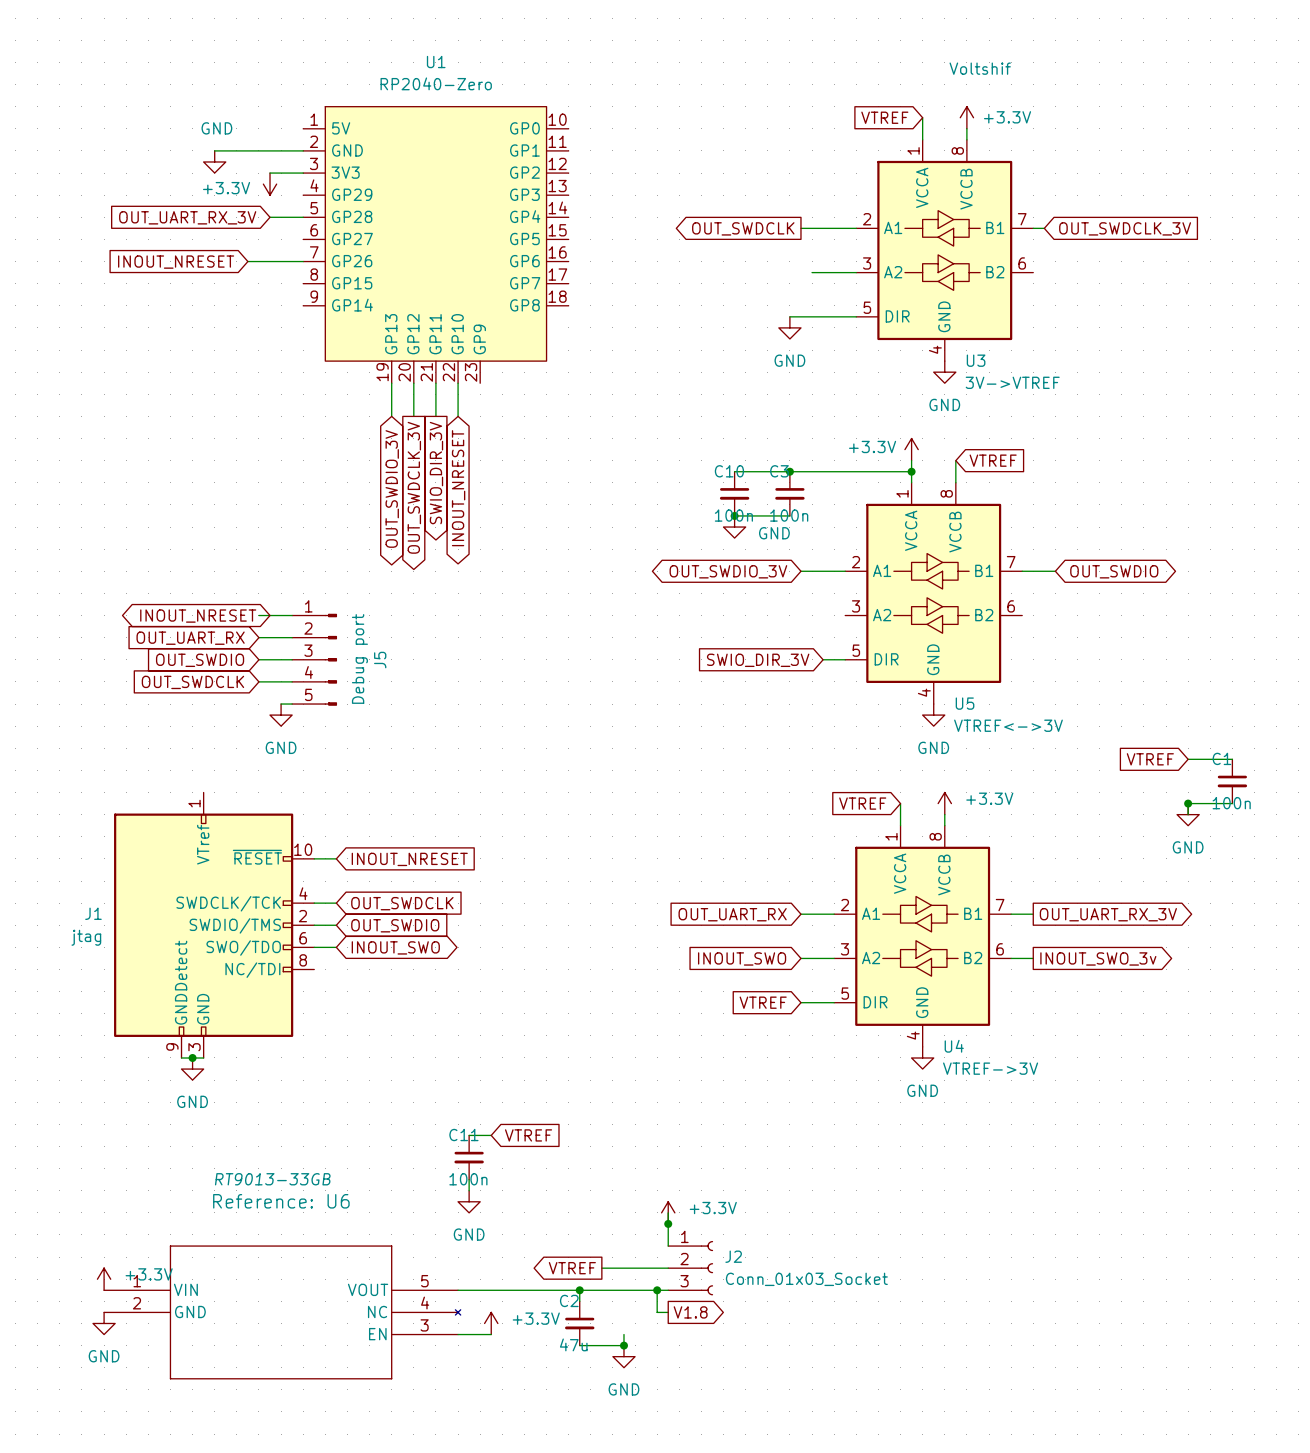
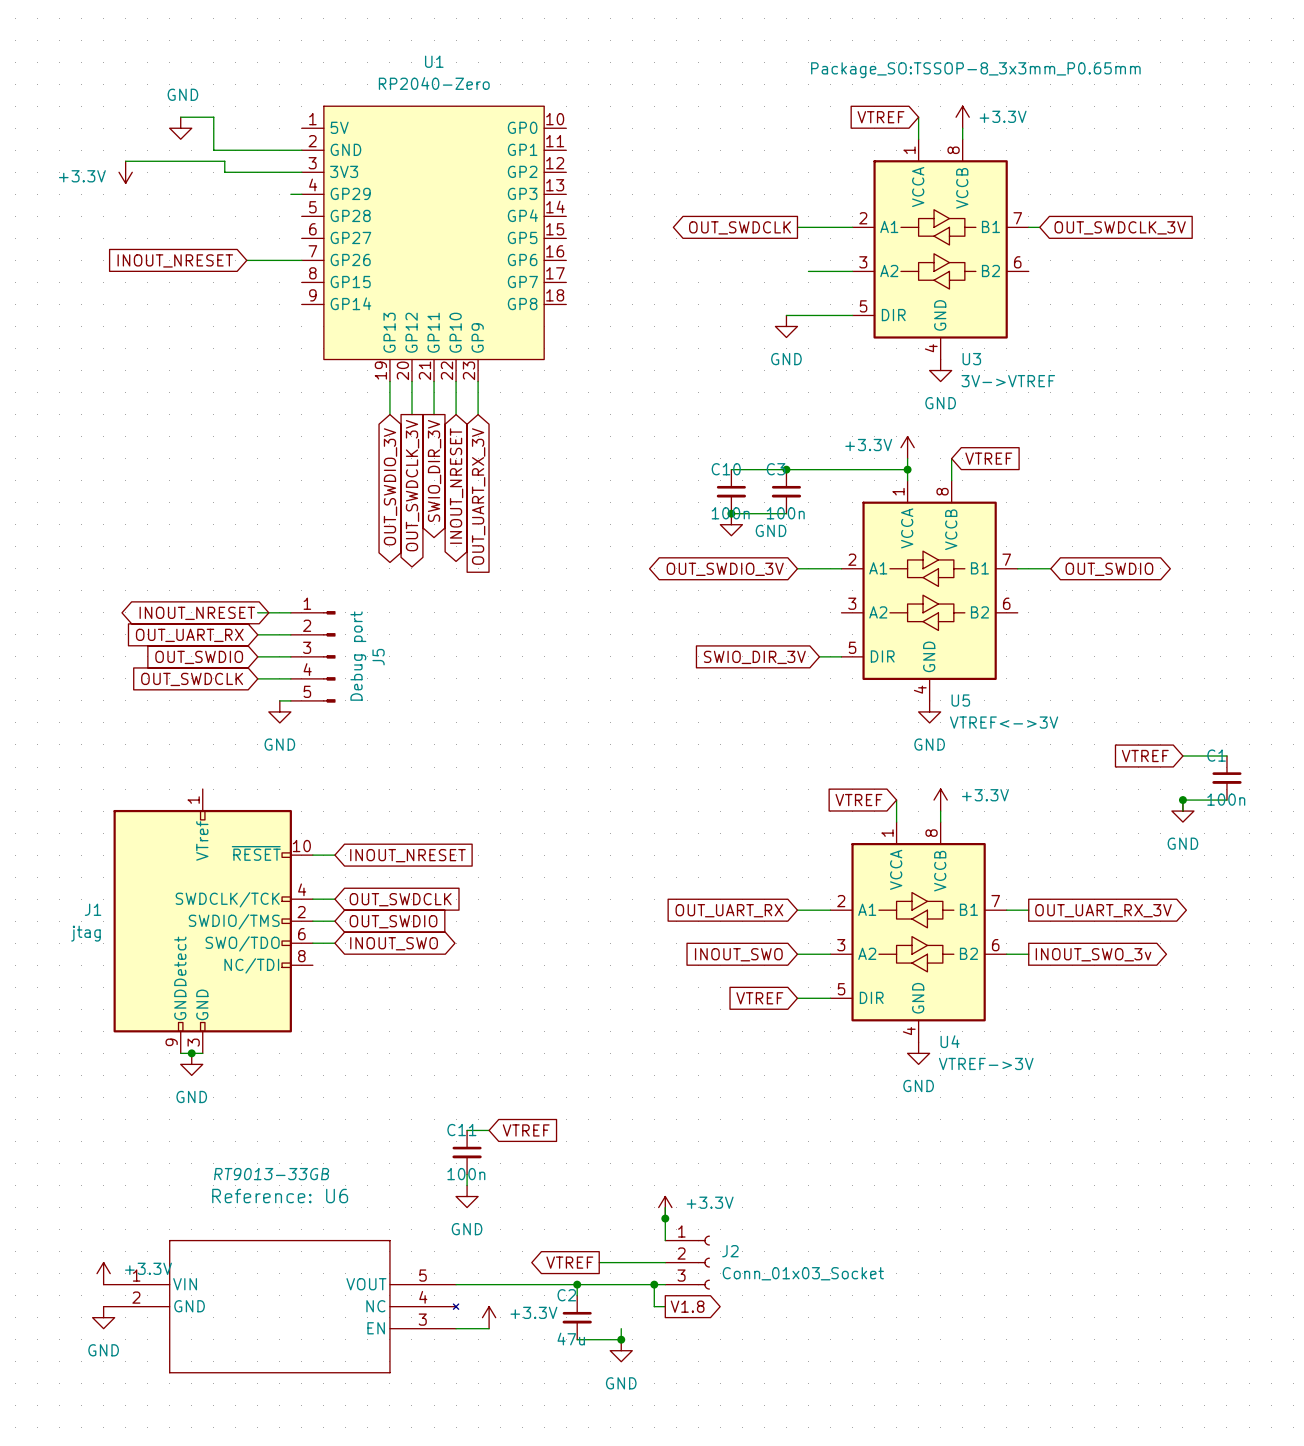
U3 text: Voltshif (980, 68) -> Package_SO:TSSOP-8_3x3mm_P0.65mm (975, 70)
wire: none -> (180, 117) (213, 117) (213, 150)
wire: none -> (125, 161) (224, 161) (224, 172) (268, 172)
power symbol position: GND (214, 161) -> GND (180, 128)
power symbol position: +3.3V (270, 184) -> +3.3V (125, 172)
wire: none -> (290, 194) (301, 194)
global label: OUT_UART_RX_3V (187, 217) -> none
wire: (270, 217) (303, 217) -> none
wire: none -> (478, 381) (478, 414)
global label: none -> OUT_UART_RX_3V (478, 496)

